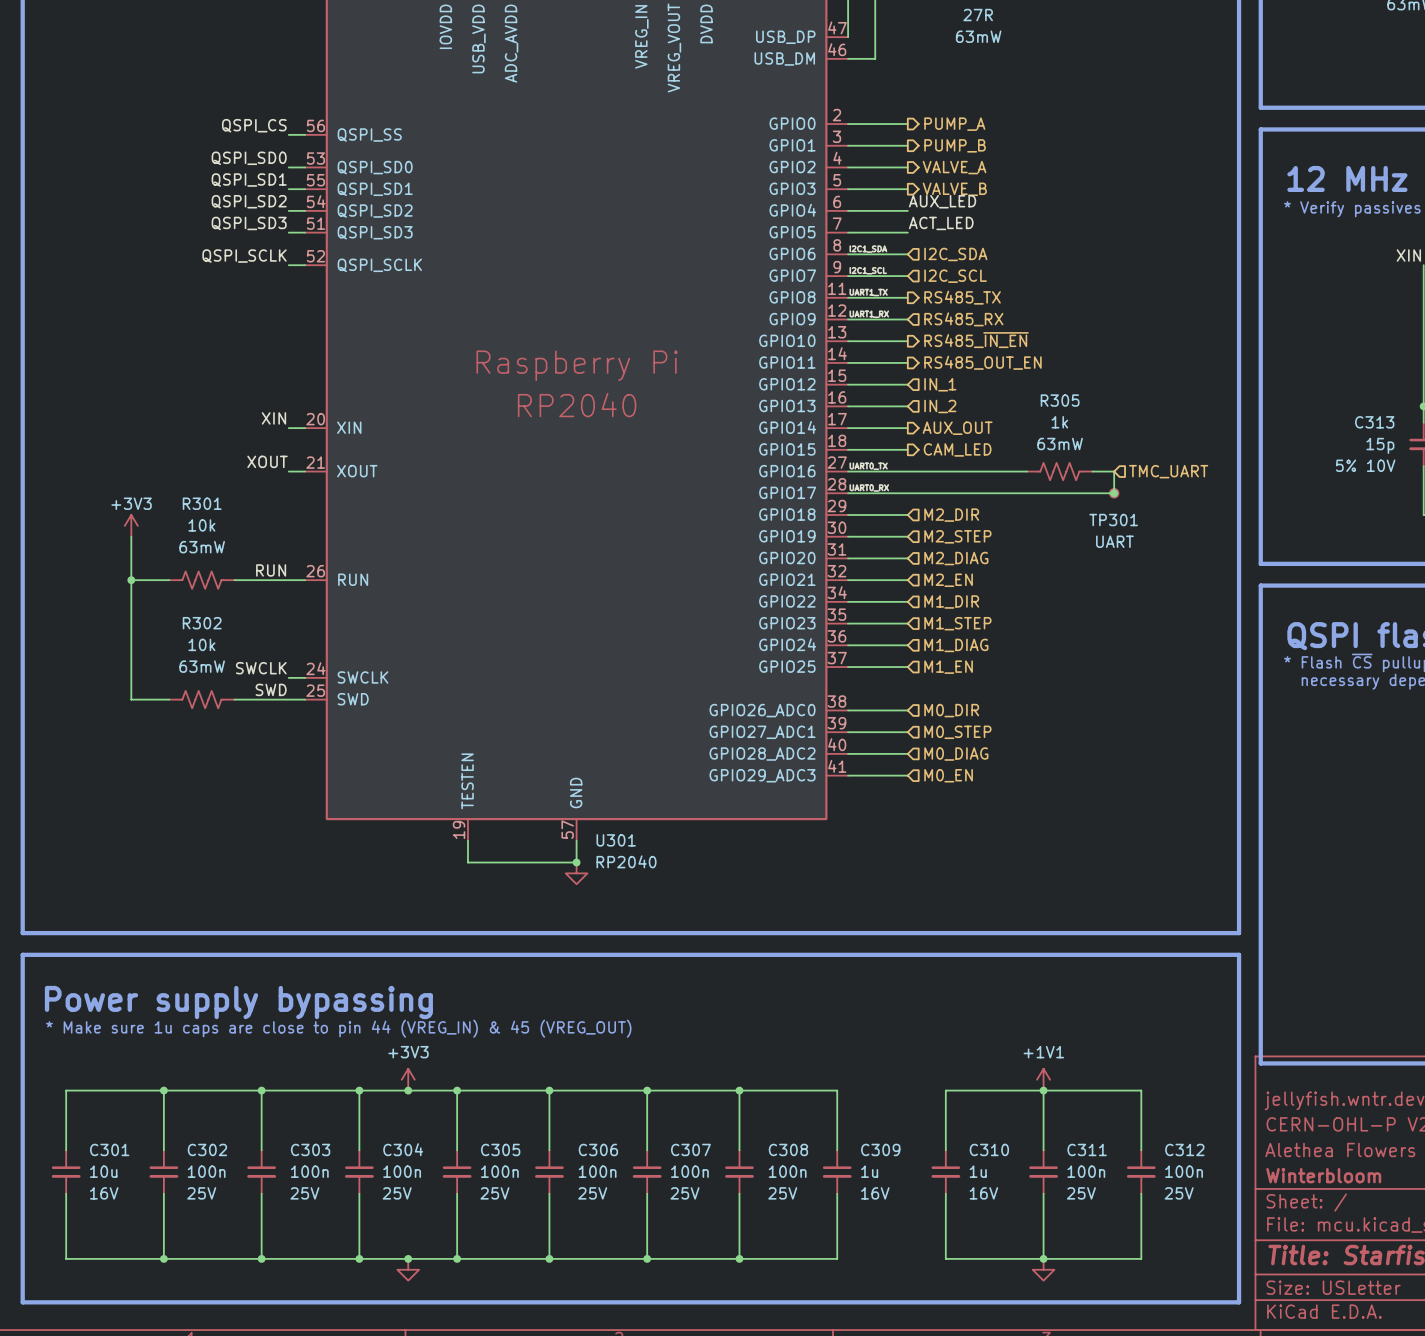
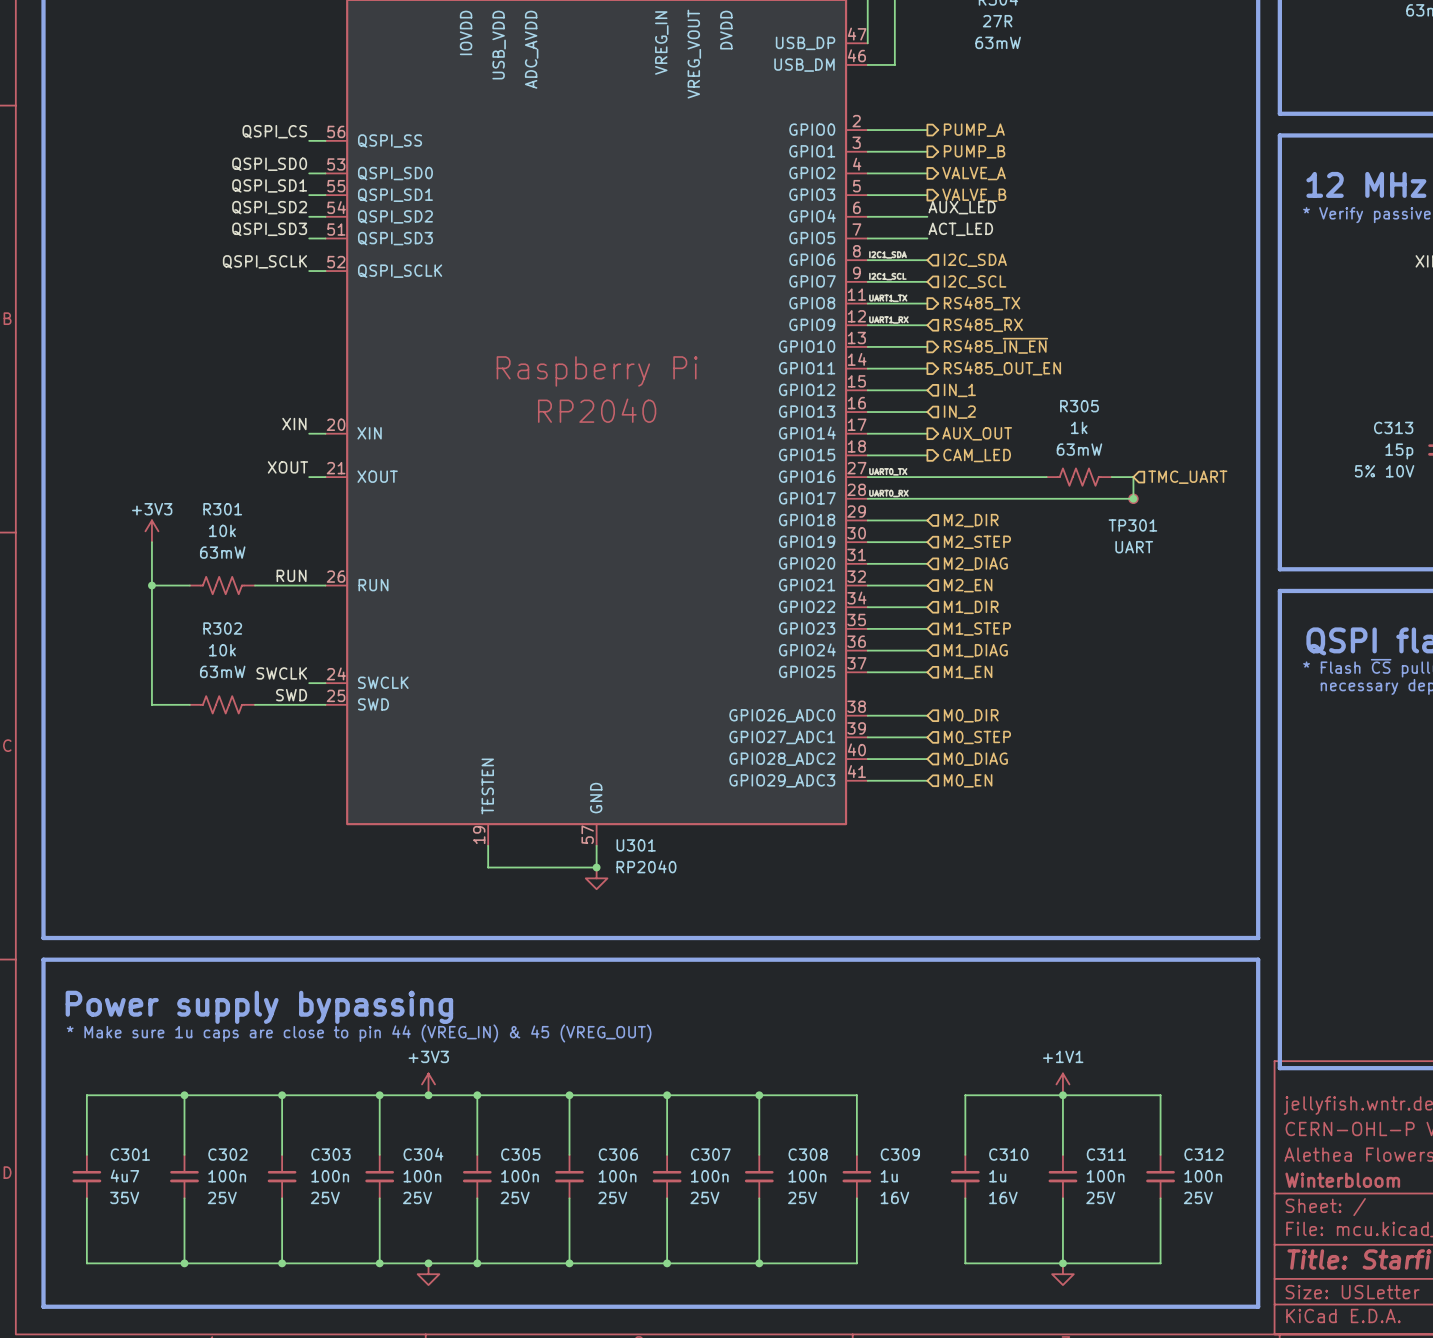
C301 value: 10u (103, 1171) -> 4u7 (124, 1175)
C301 text: 16V (104, 1193) -> 35V (124, 1197)

